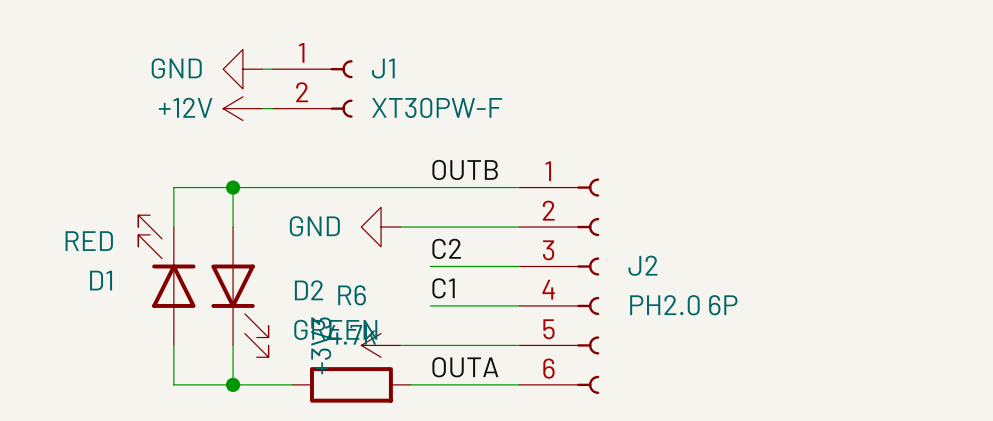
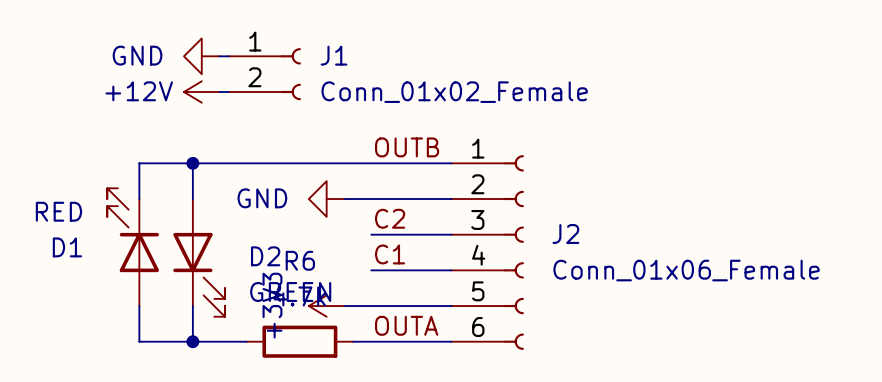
J1 value: XT30PW-F (437, 107) -> Conn_01x02_Female (454, 92)
J2 value: PH2.0 6P (683, 305) -> Conn_01x06_Female (686, 270)

